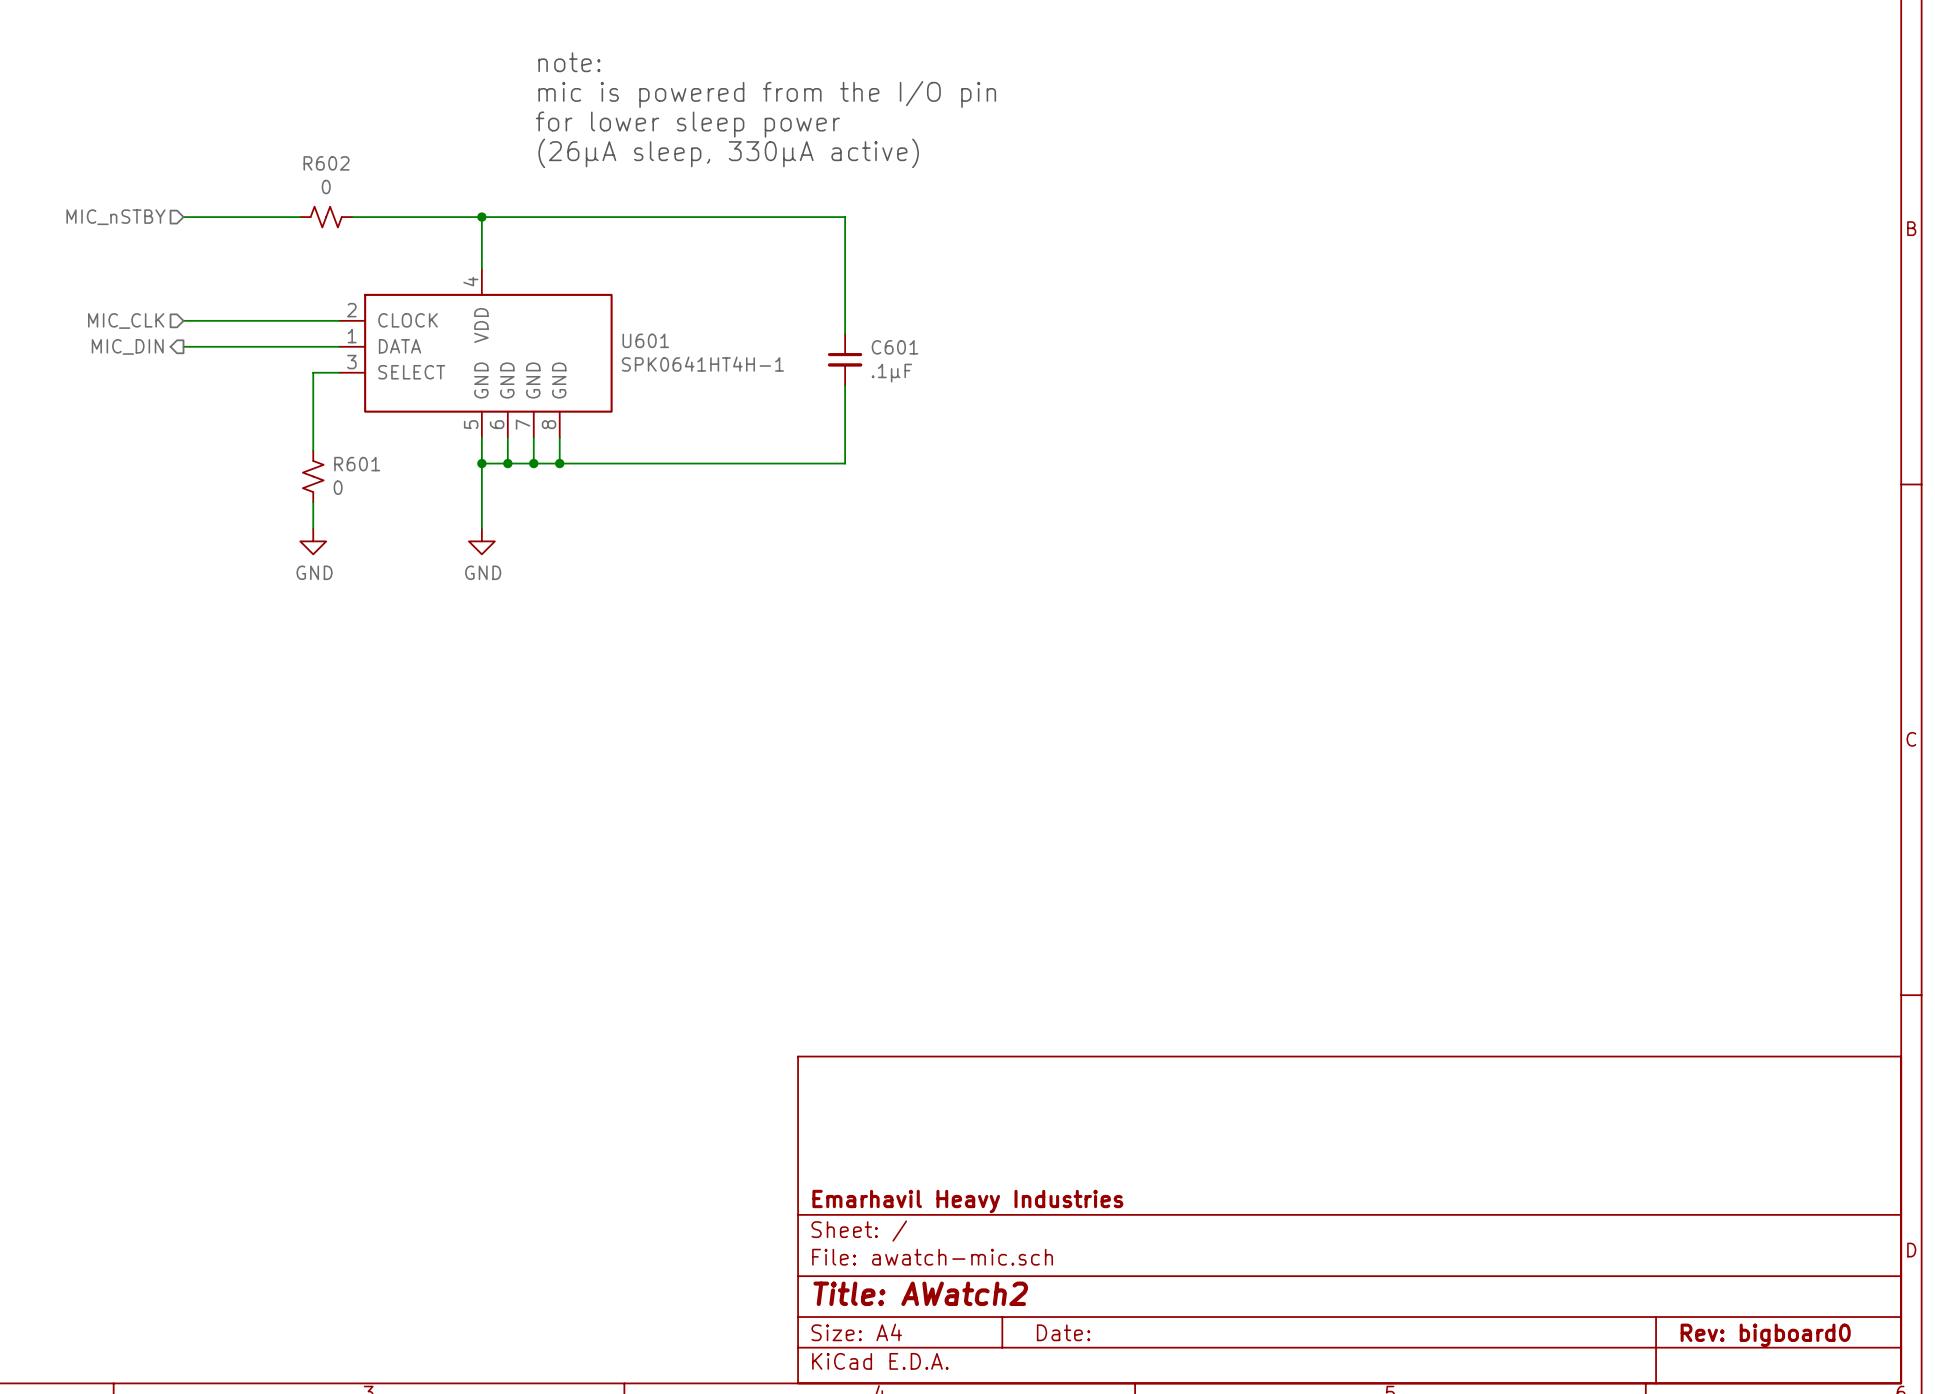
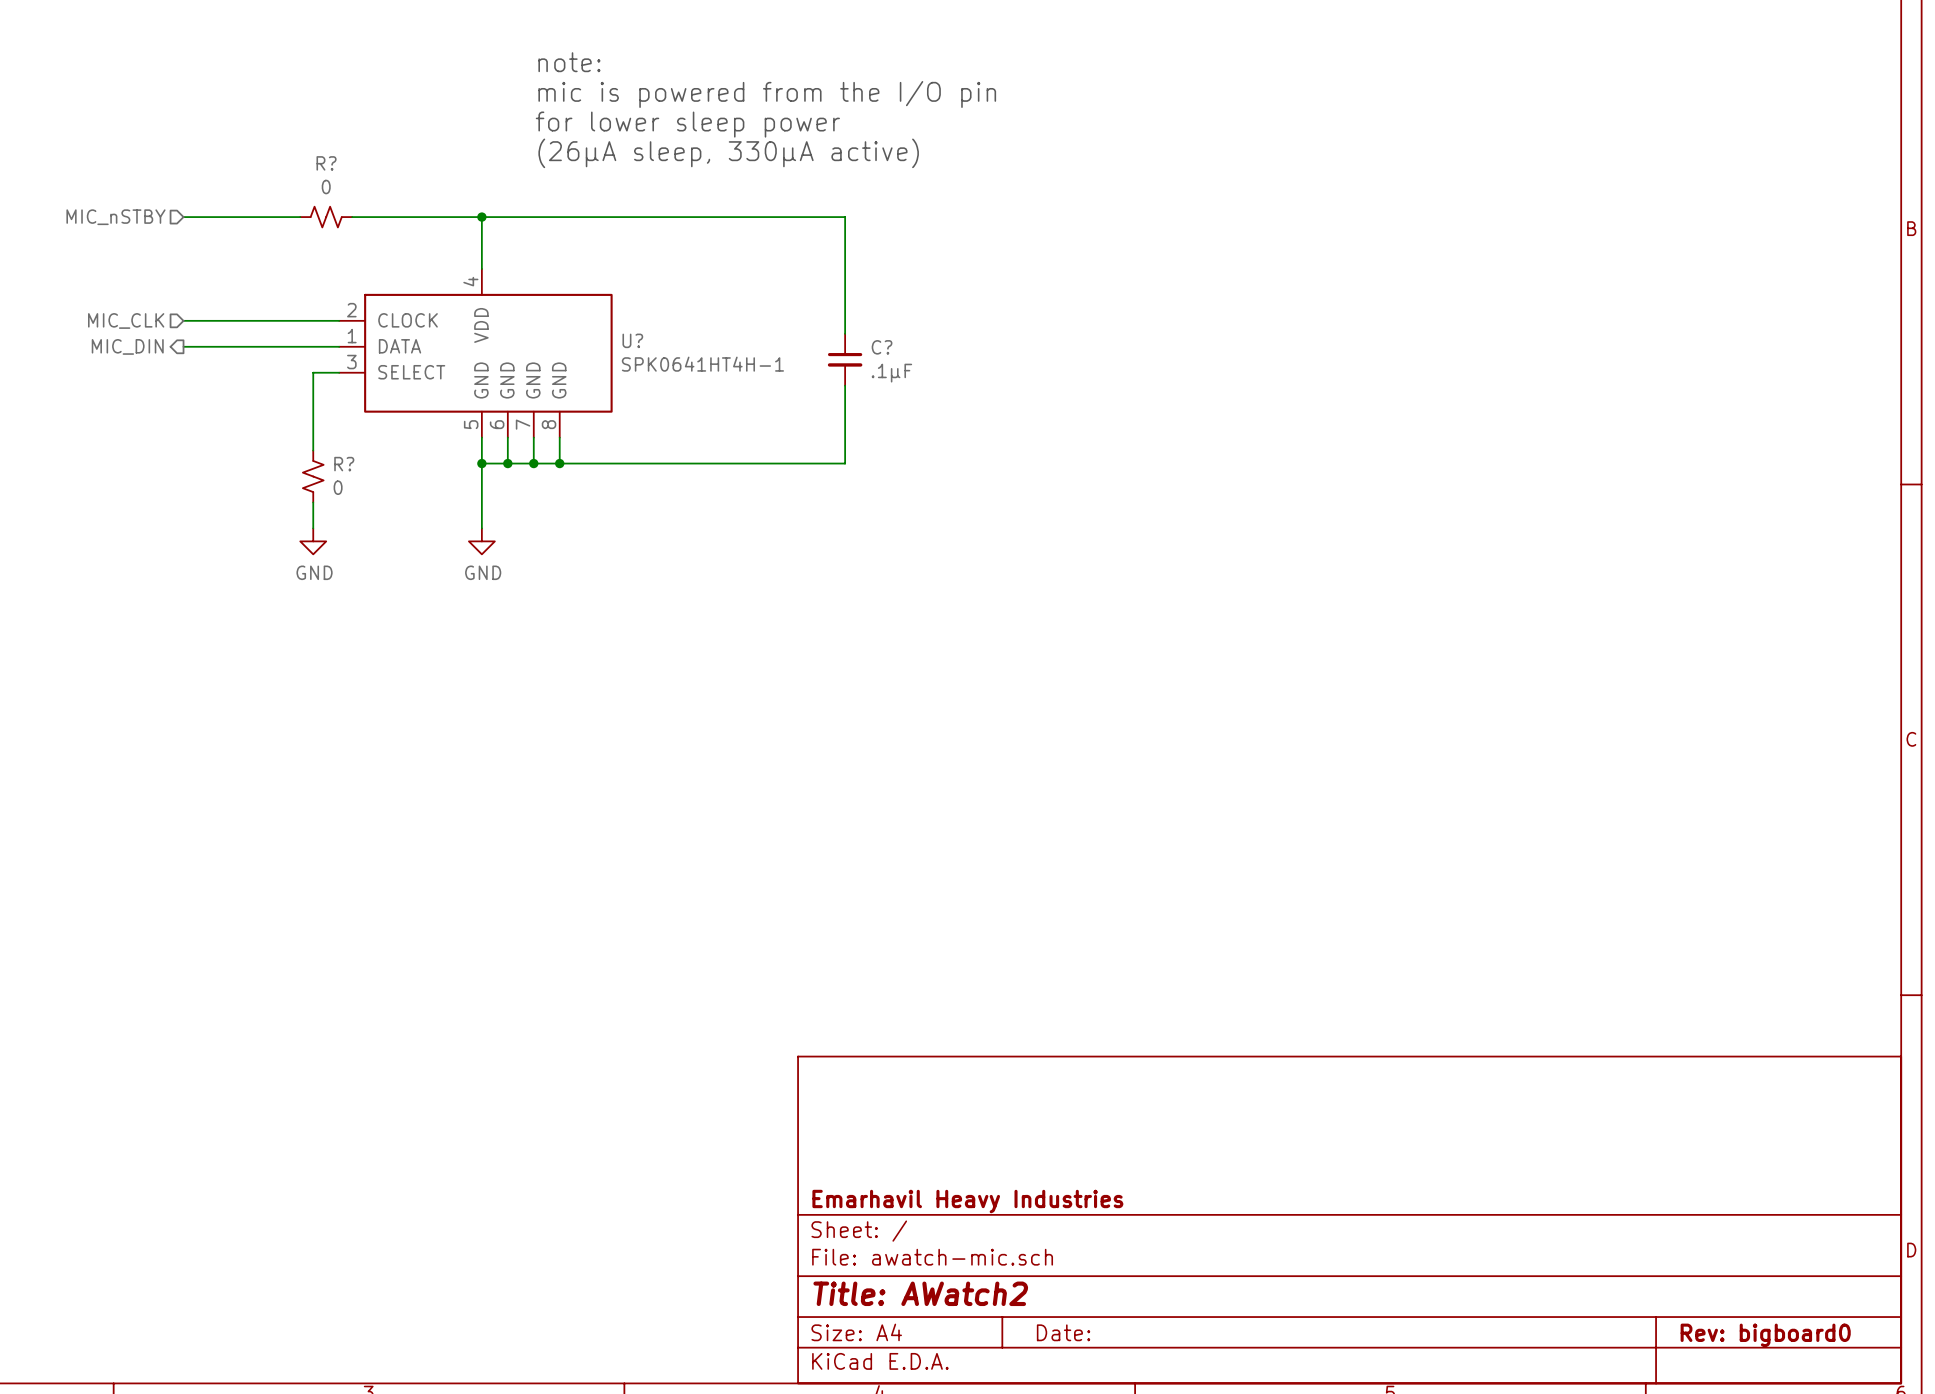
R602 name: R602 (326, 163) -> R? (326, 163)
U601 name: U601 (645, 340) -> U? (632, 340)
C601 name: C601 (895, 347) -> C? (882, 347)
R601 name: R601 (357, 464) -> R? (344, 464)

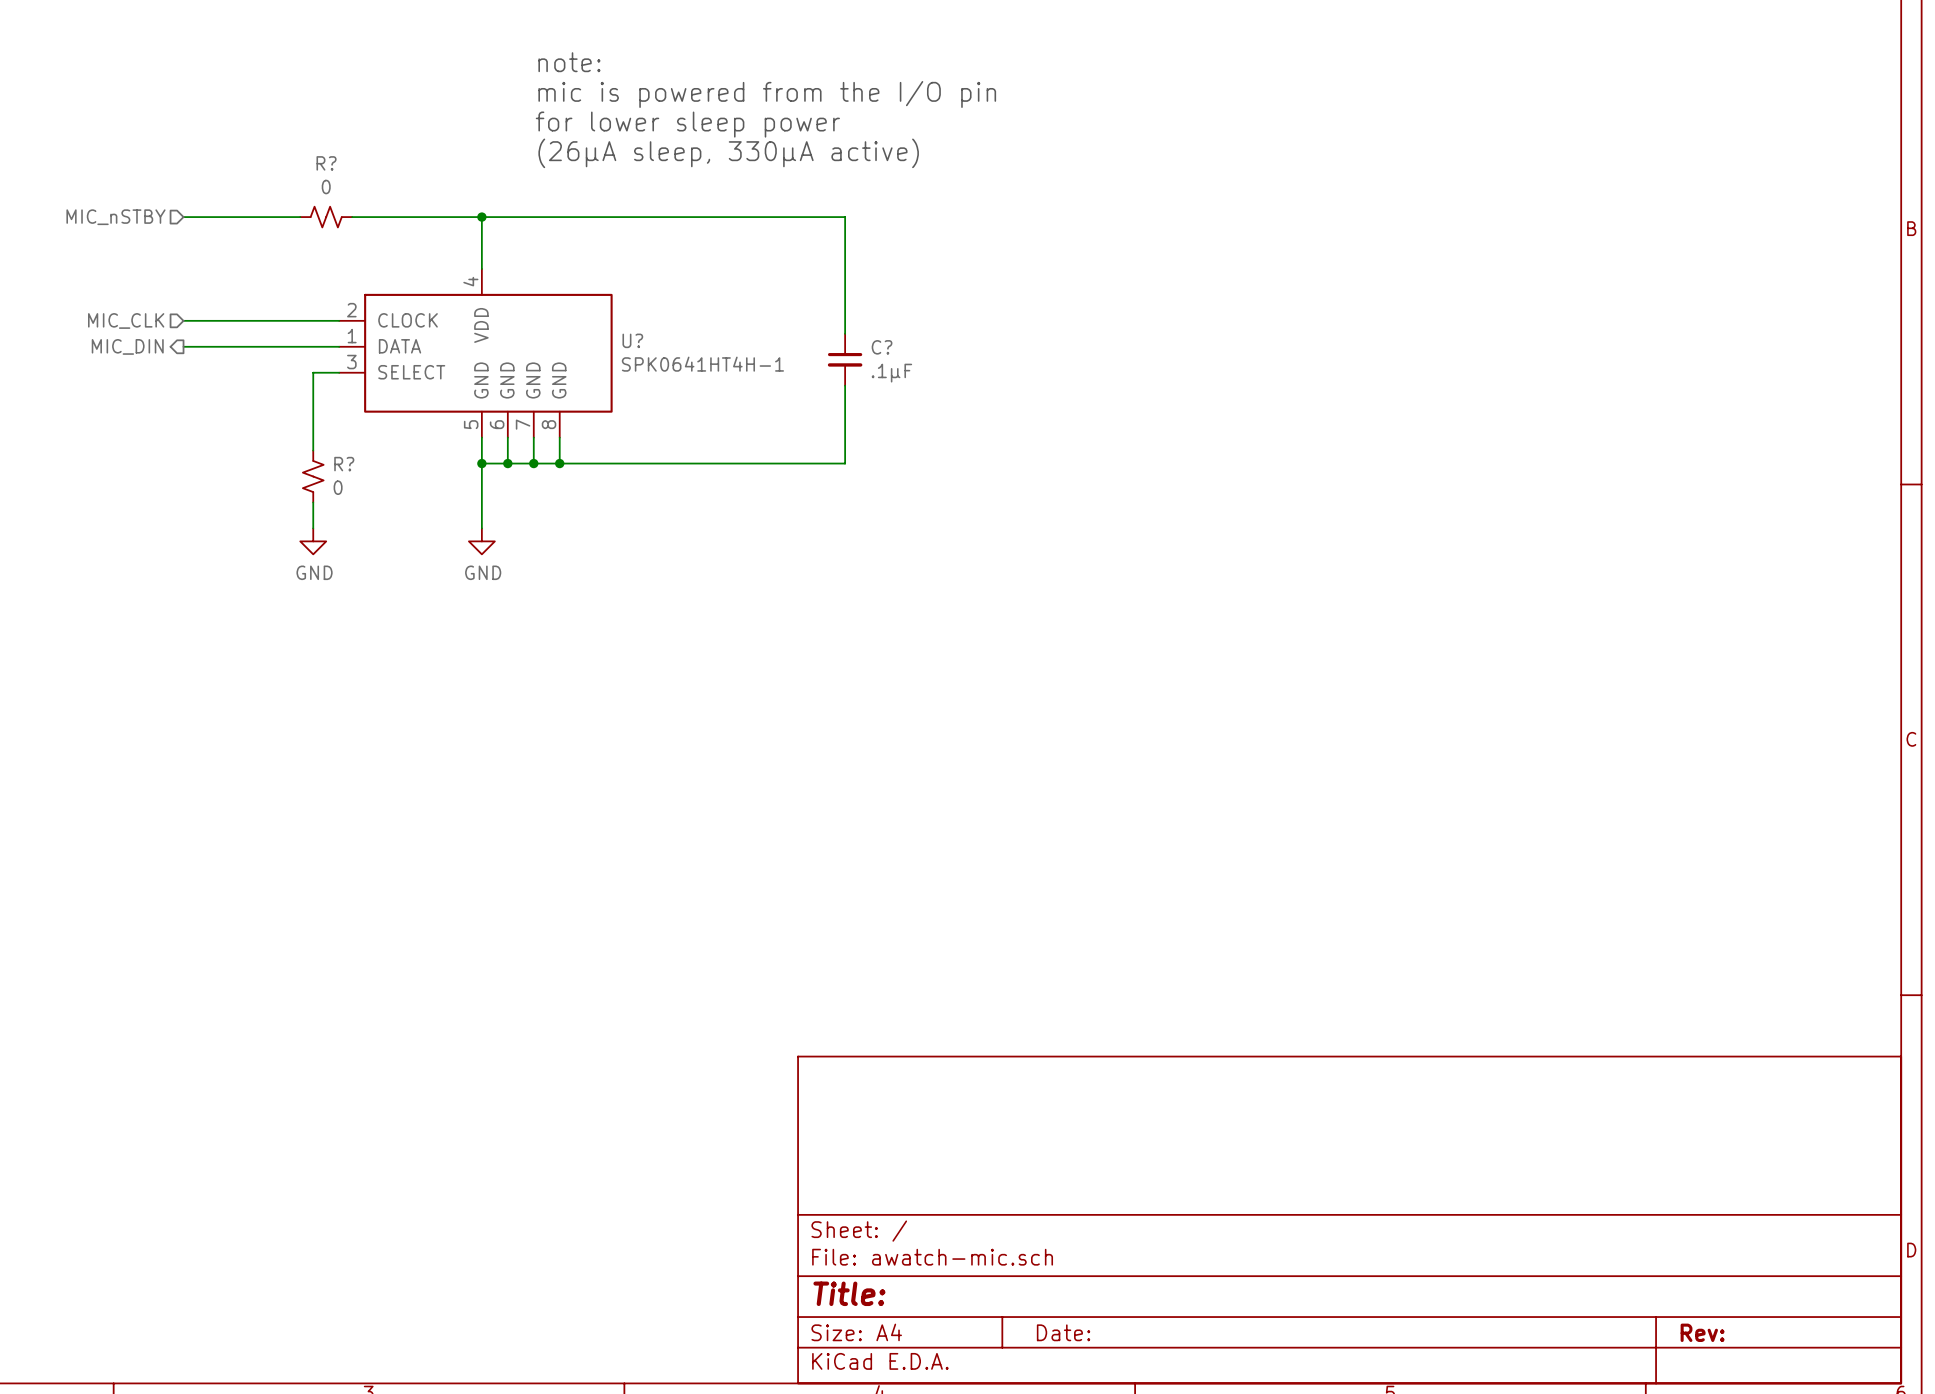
title block: Emarhavil Heavy Industries (967, 1201) -> none
title block: Title: AWatch2 (920, 1293) -> Title: (849, 1293)
title block: Rev: bigboard0 (1765, 1335) -> Rev: (1702, 1332)

